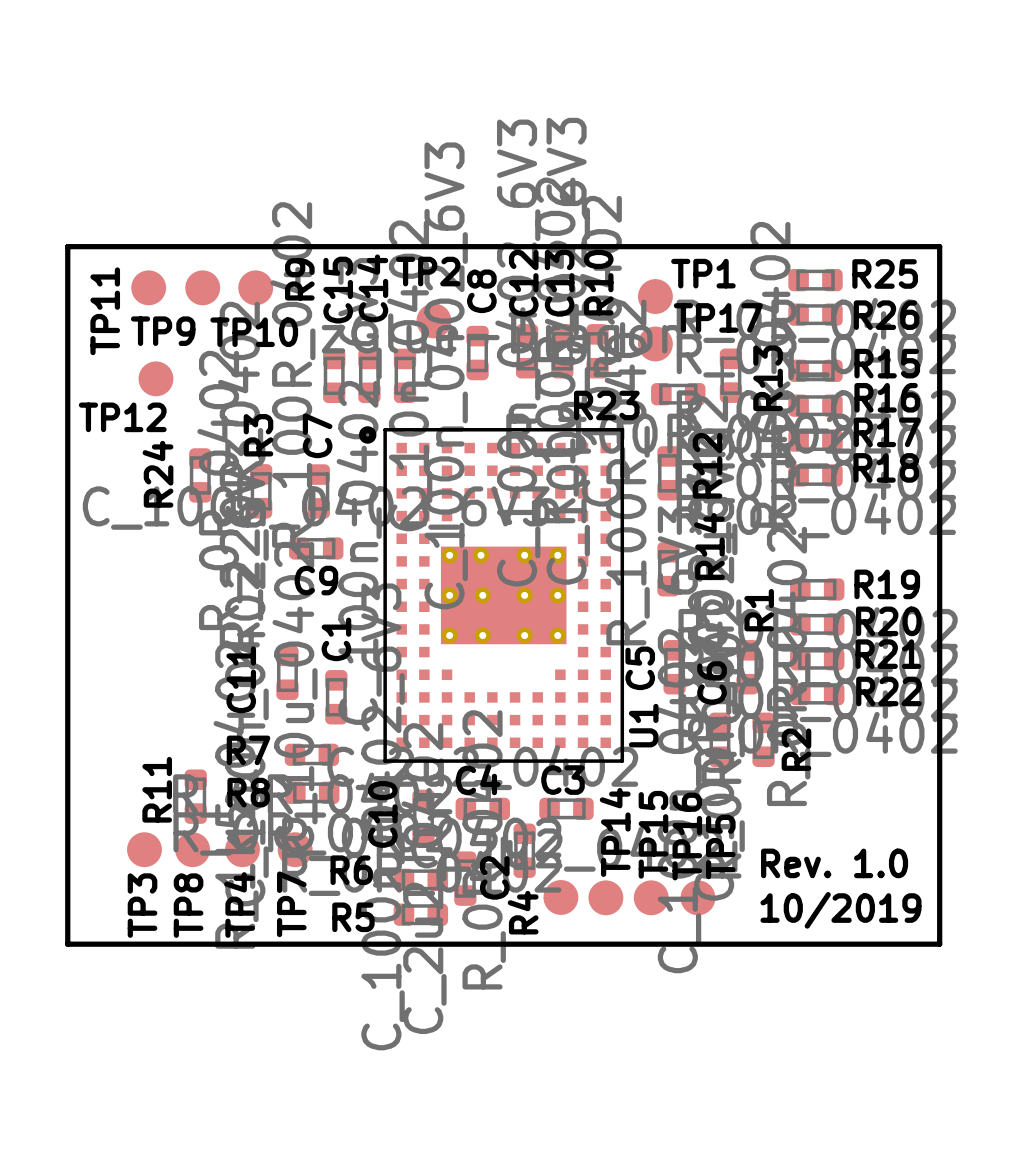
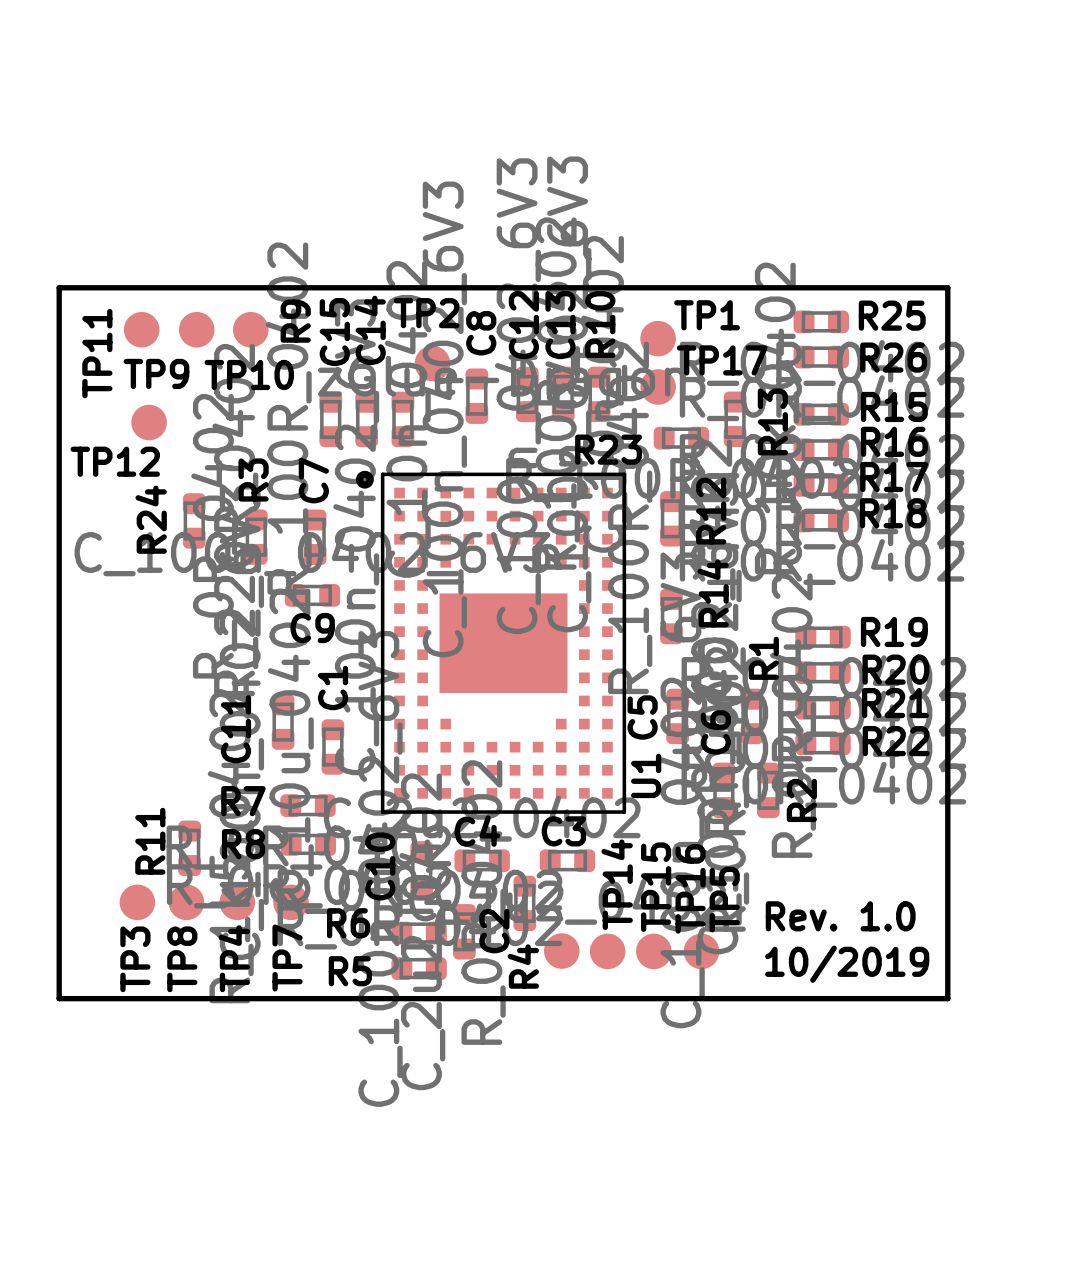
U1 footprint: [383, 428, 625, 763] -> [380, 472, 627, 814]

